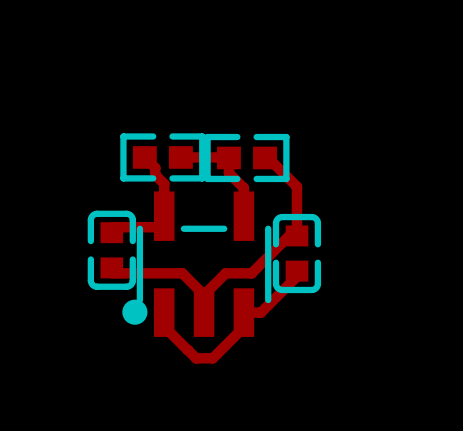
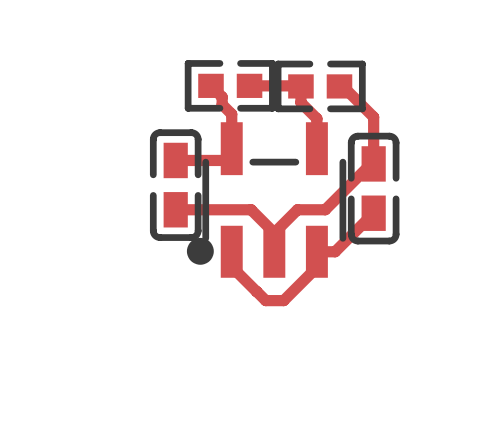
part footprint: [87, 210, 136, 290] -> [149, 129, 202, 241]
part footprint: [272, 213, 322, 294] -> [347, 132, 400, 245]

